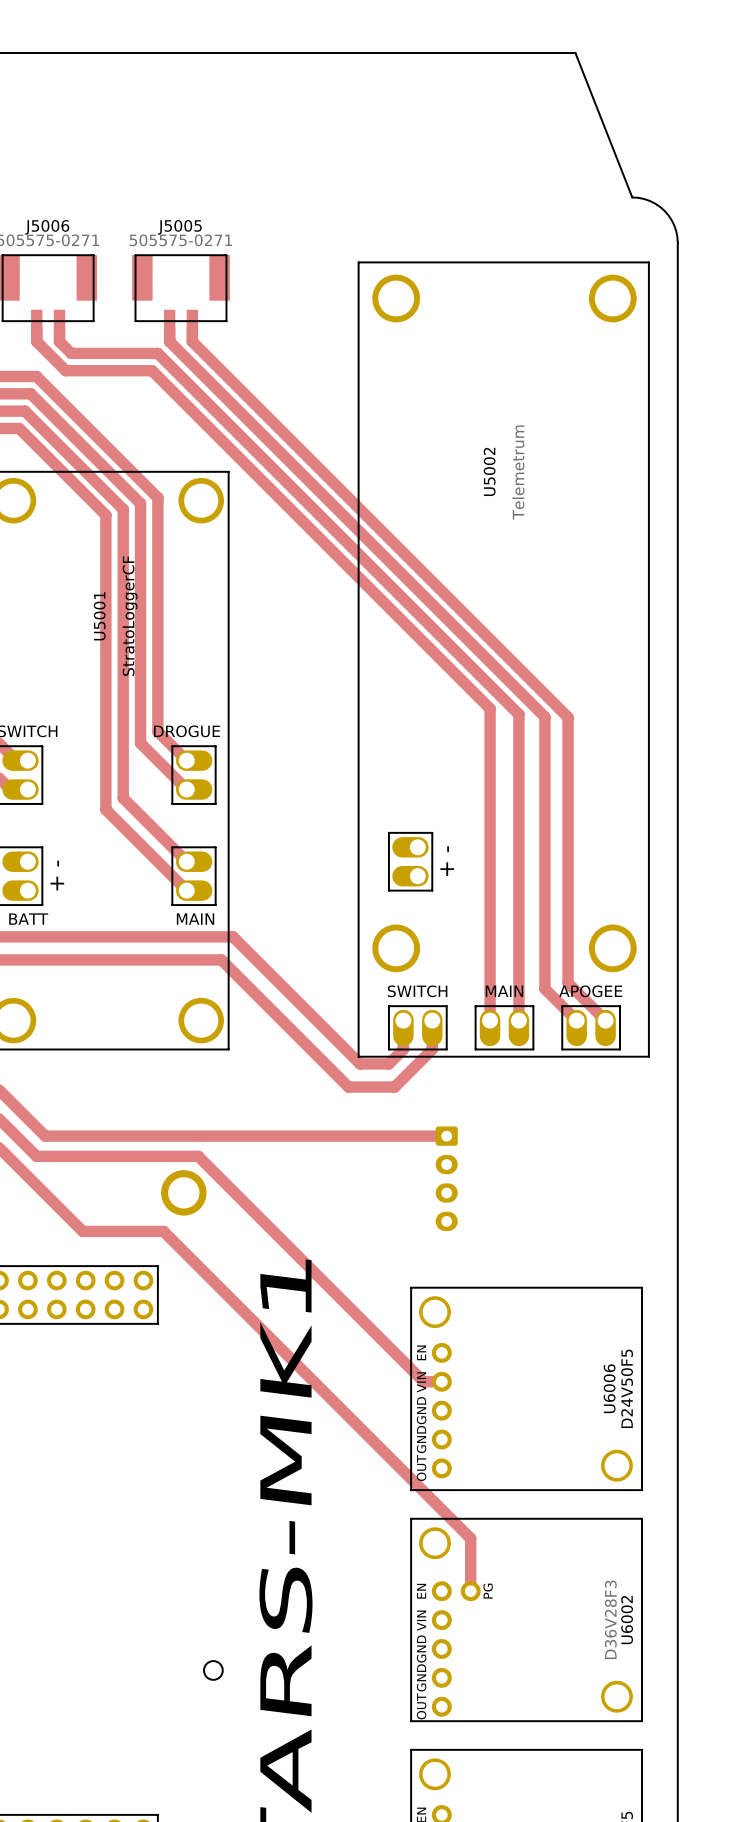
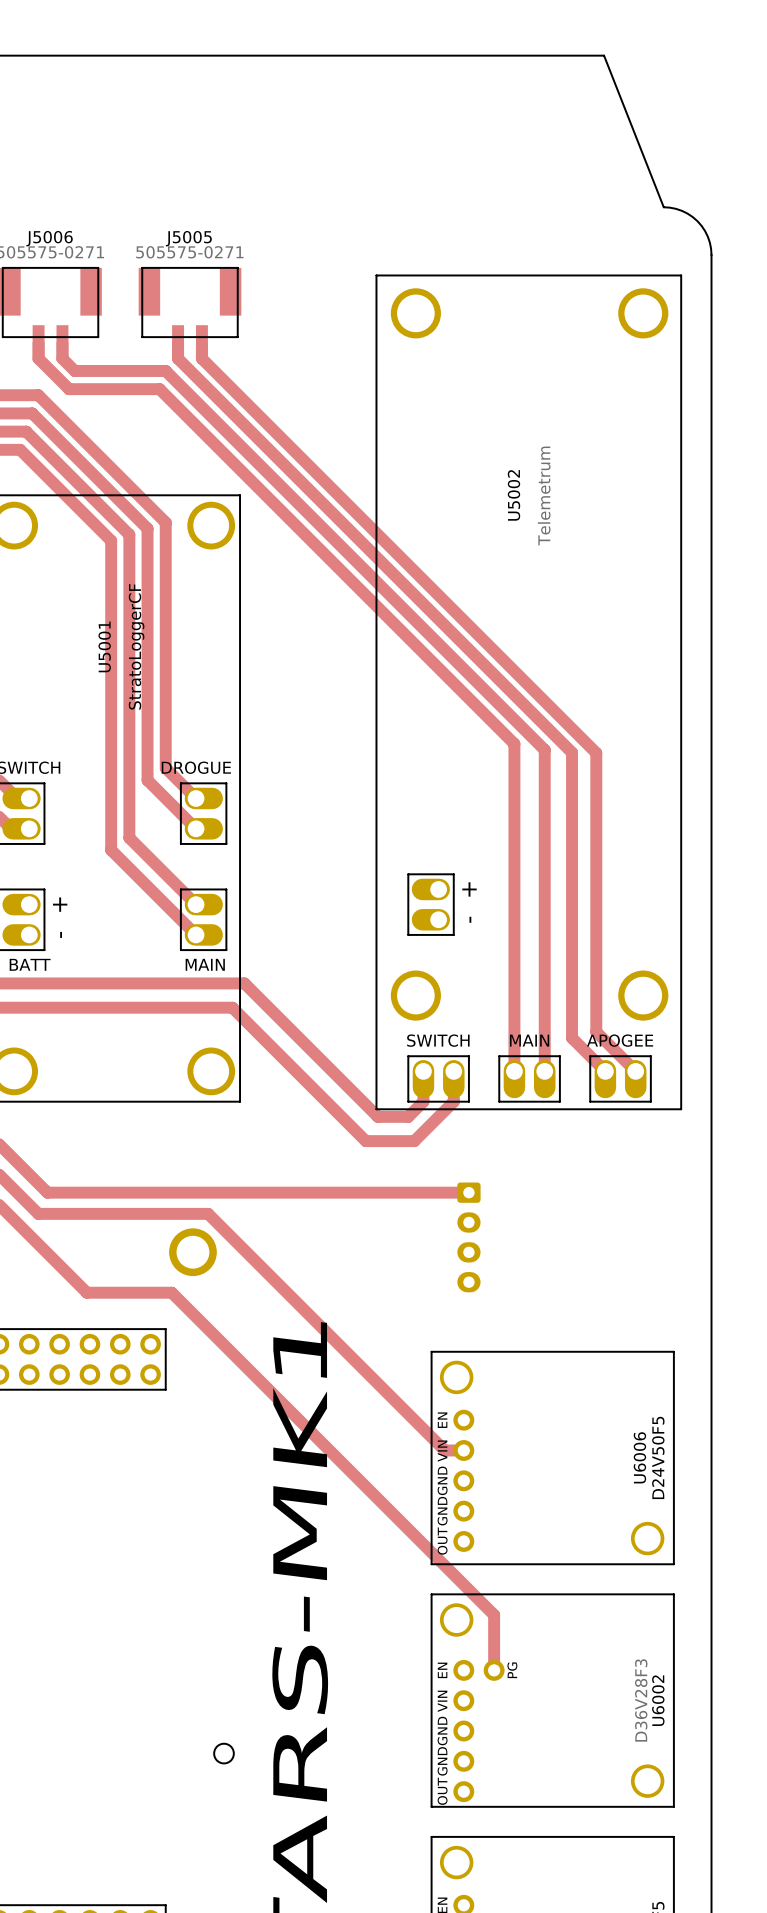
U5002 text: none -> + (469, 889)
U5001 text: none -> + (60, 904)
U5002 text: + - (447, 861) -> none
U5001 text: + - (57, 875) -> none
U5002 text: none -> - (470, 919)
U5001 text: none -> - (61, 934)

